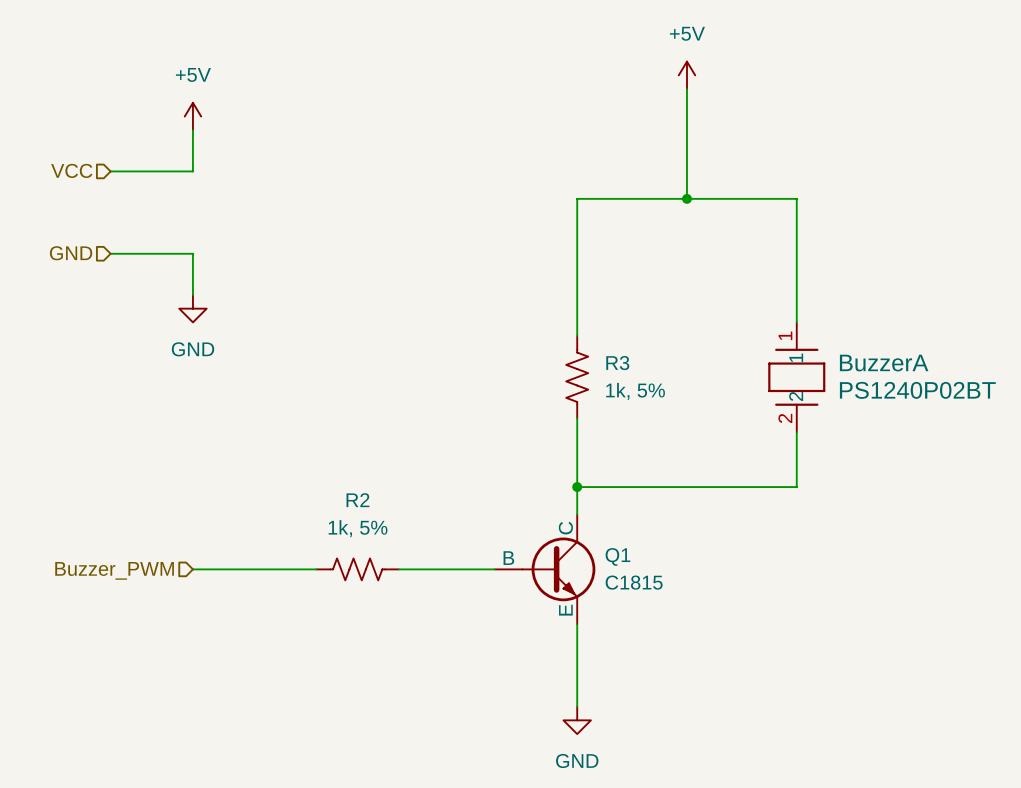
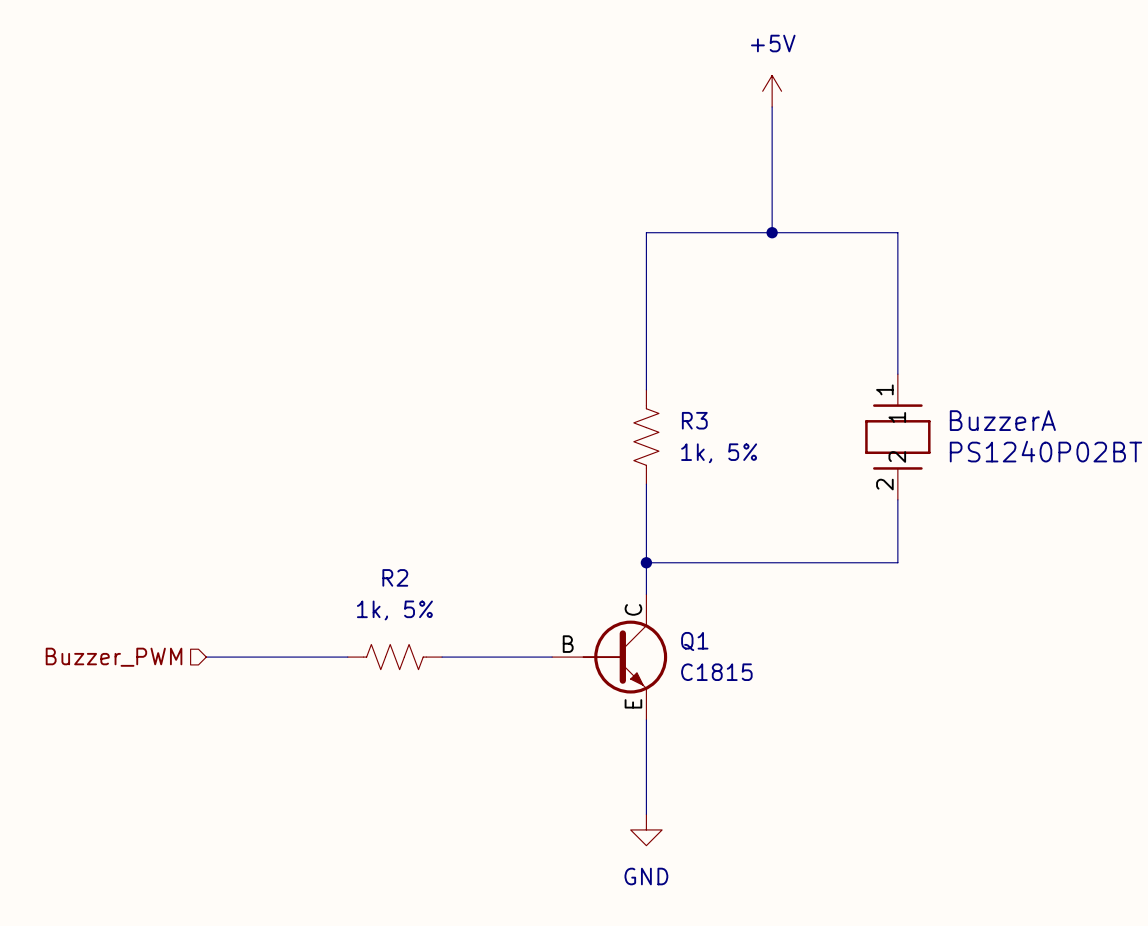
power symbol: +5V (192, 116) -> none
wire: (192, 130) (192, 171) (110, 171) -> none
hierarchical label: VCC (71, 170) -> none
hierarchical label: GND (71, 253) -> none
wire: (110, 253) (192, 253) (192, 294) -> none
power symbol: GND (192, 308) -> none

